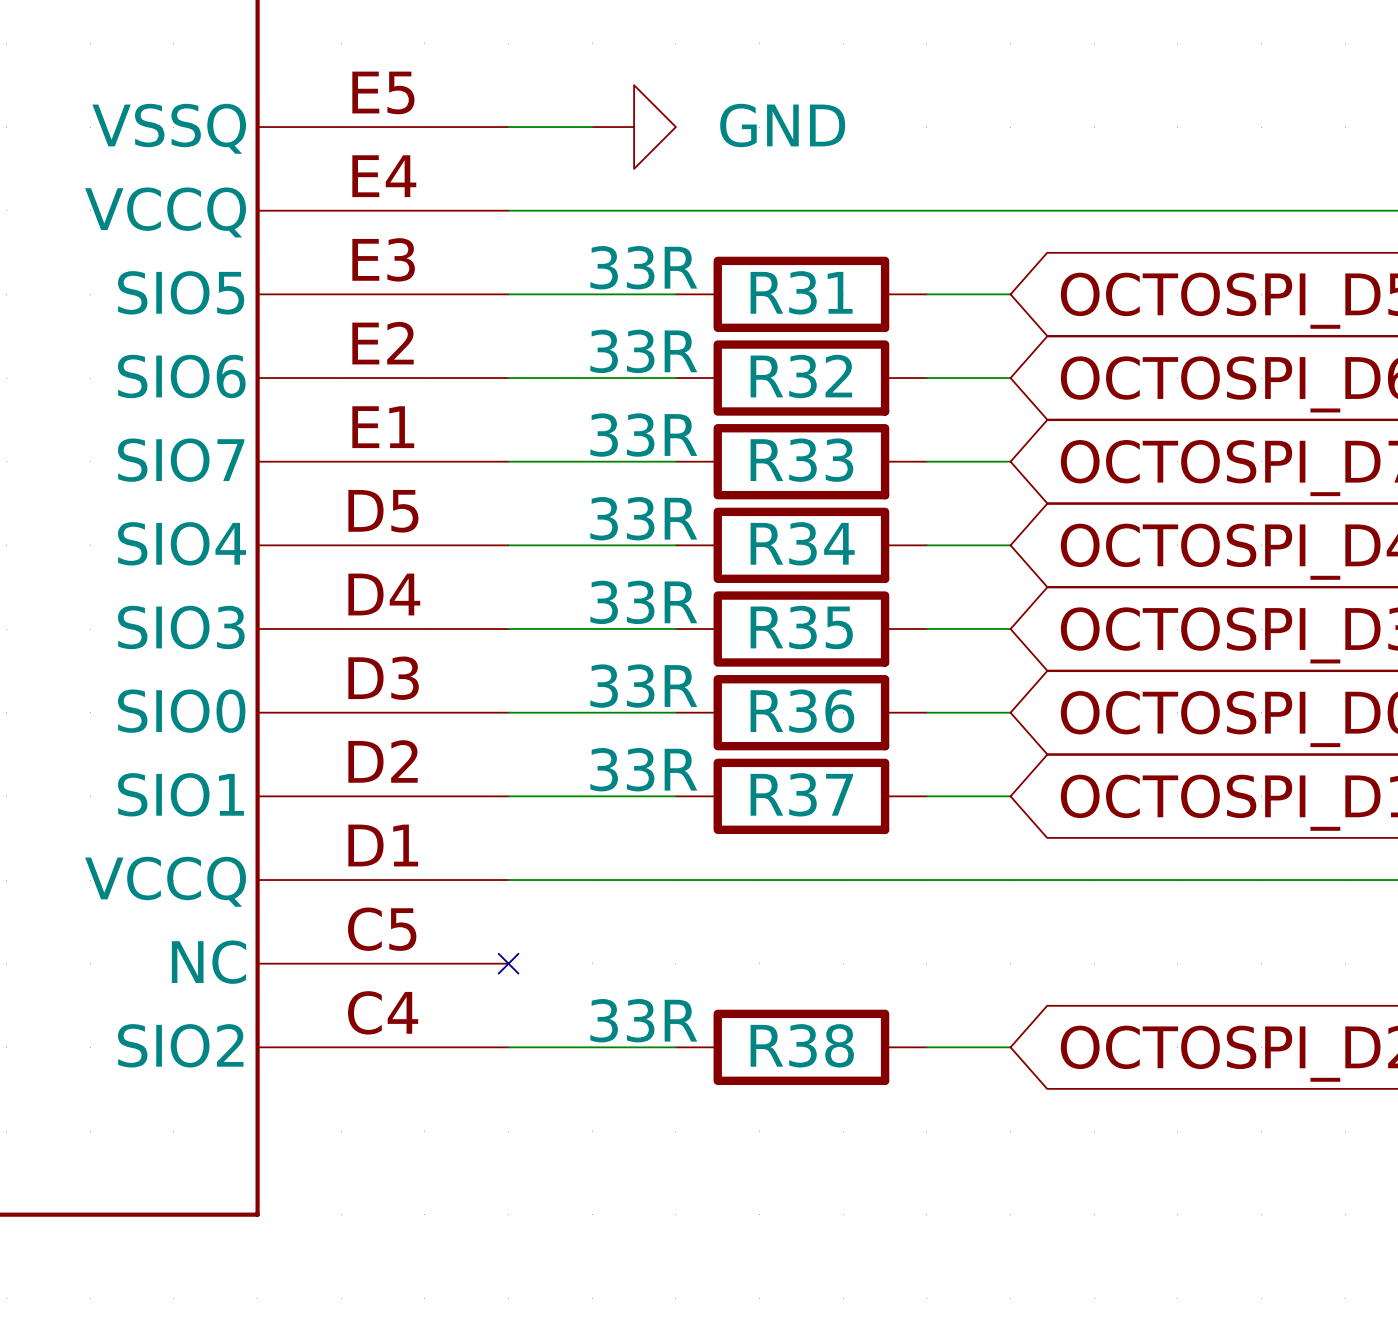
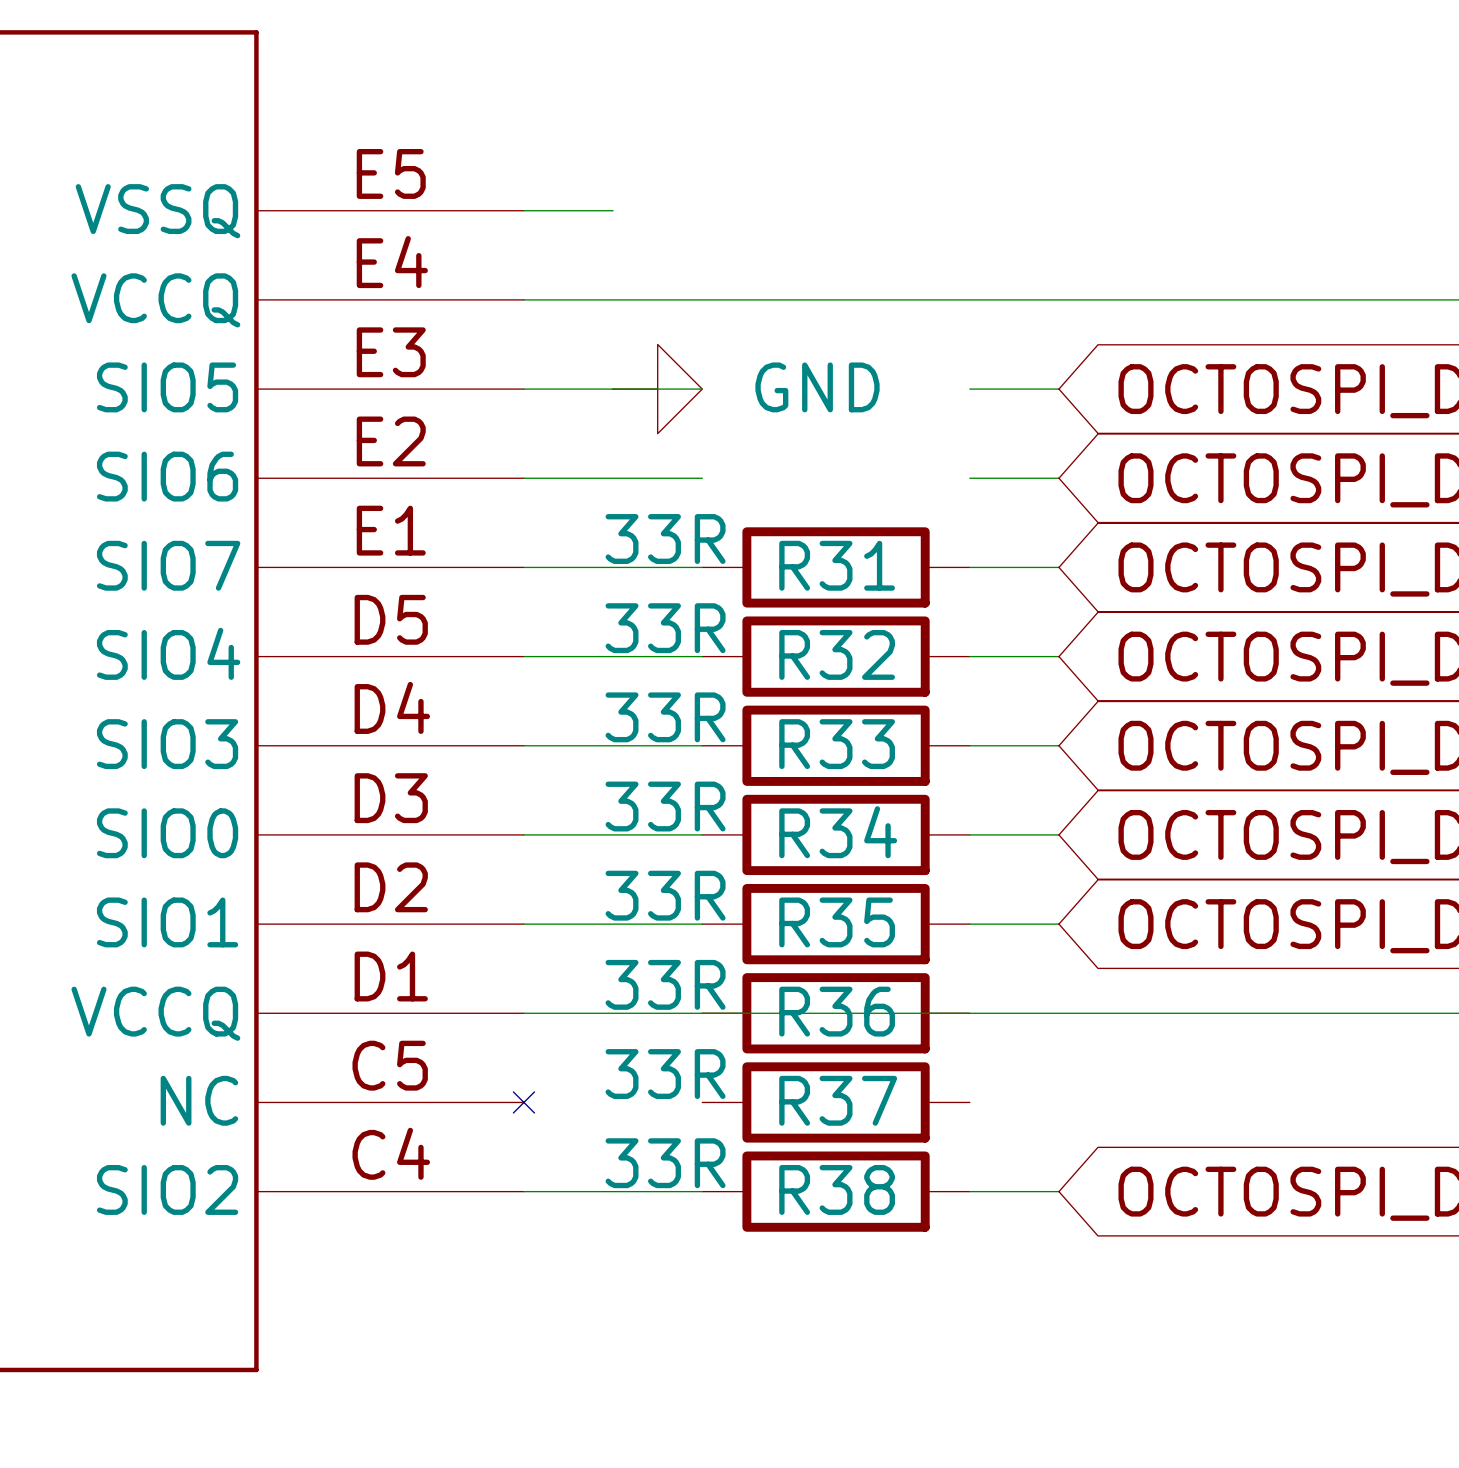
power symbol position: GND (634, 127) -> GND (657, 389)
R31: 33R (801, 294) -> none
R32: 33R (801, 378) -> none
R33 name: R33 (801, 460) -> R31 (837, 565)
R34 name: R34 (802, 543) -> R32 (837, 654)
R35 name: R35 (801, 627) -> R33 (837, 744)
R36 name: R36 (802, 711) -> R34 (838, 832)
R37 name: R37 (801, 794) -> R35 (837, 922)
R36: none -> 33R (836, 1013)
R37: none -> 33R (836, 1102)

